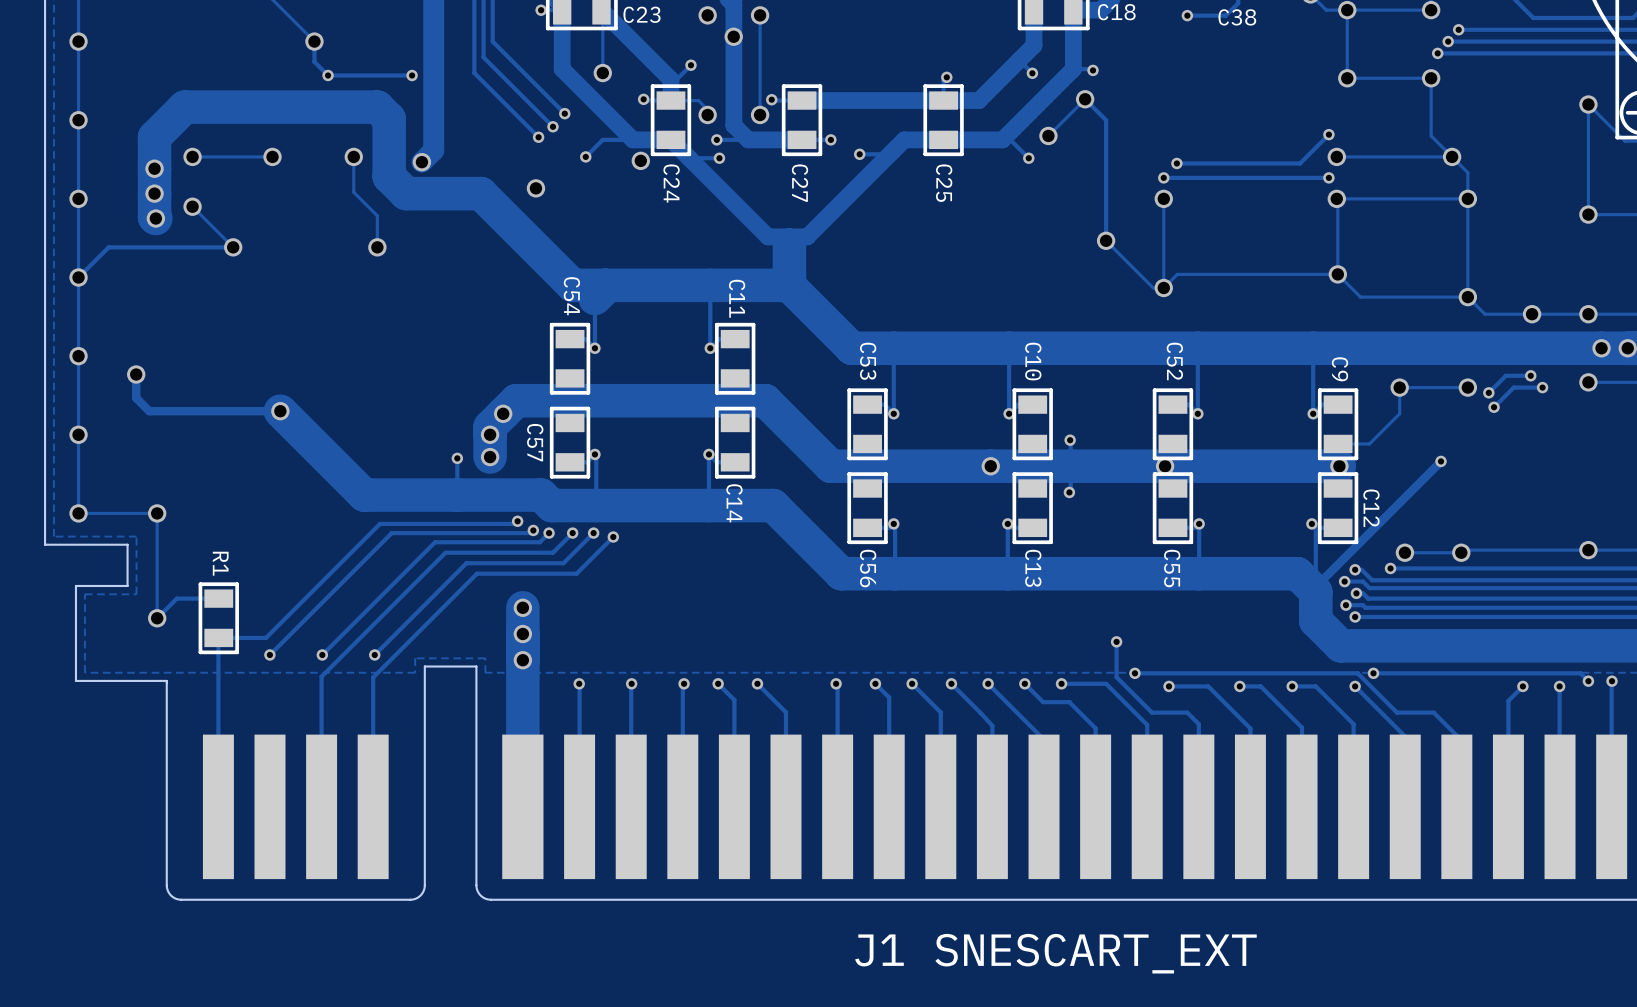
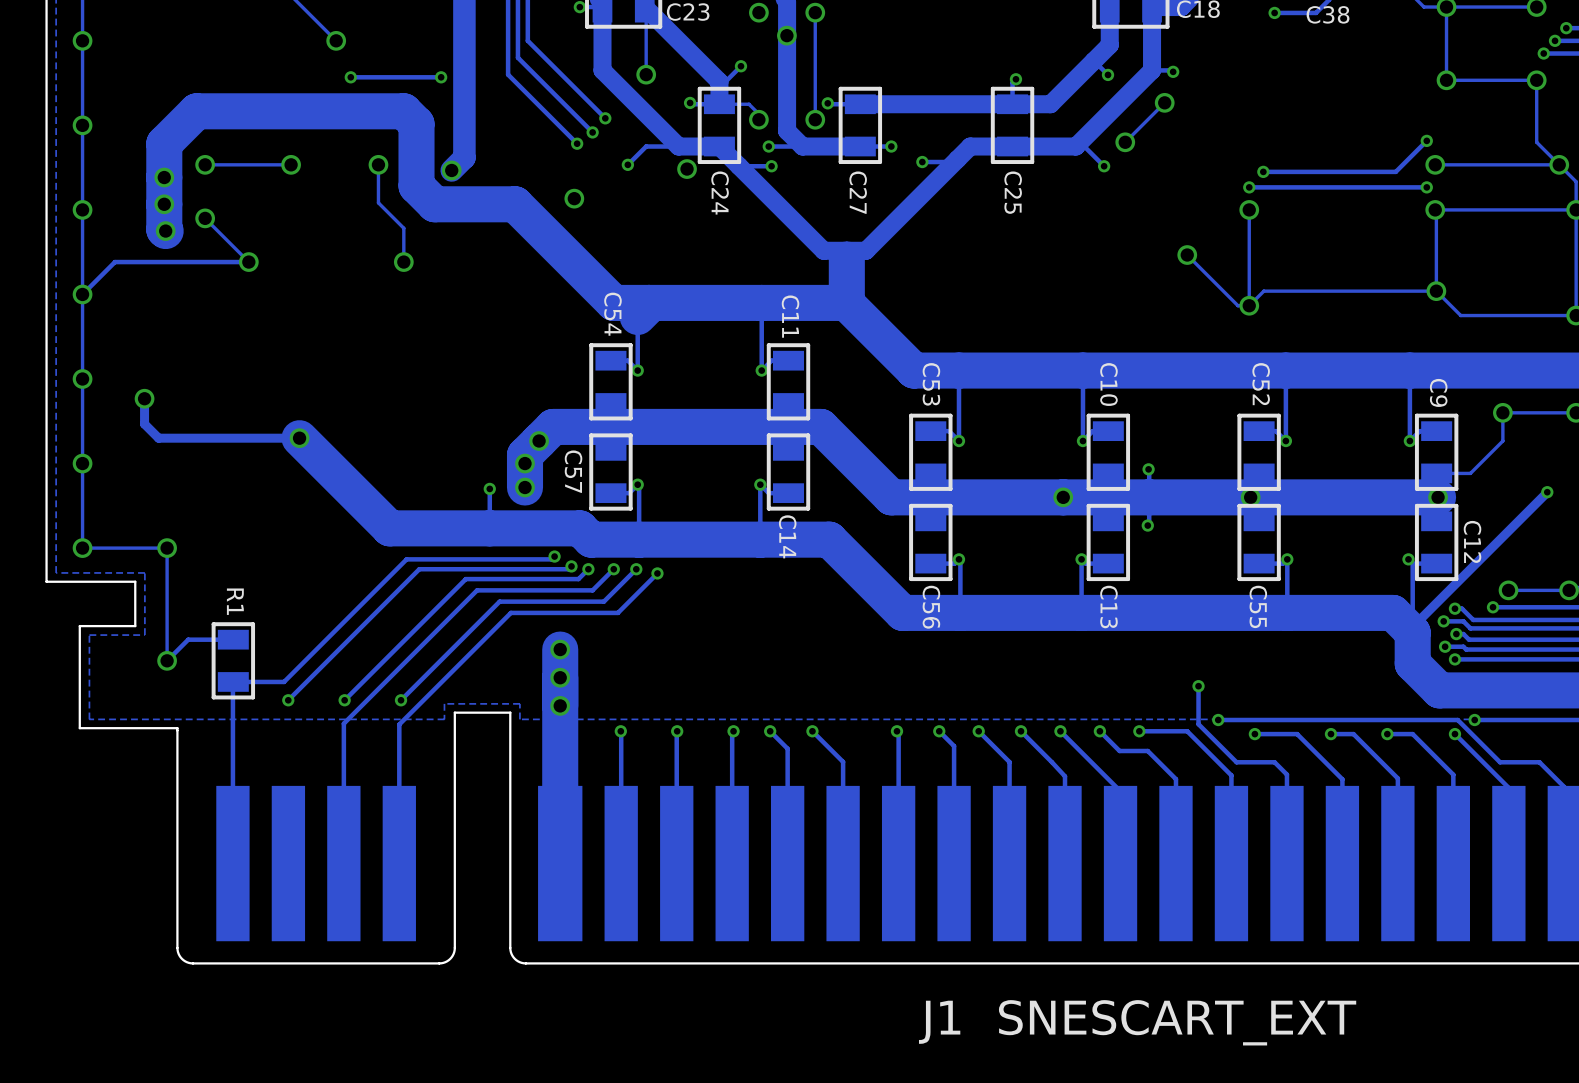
track: (314, 41) (314, 61) (328, 75) -> none
track: (1085, 99) (1106, 120) (1106, 240) -> none

